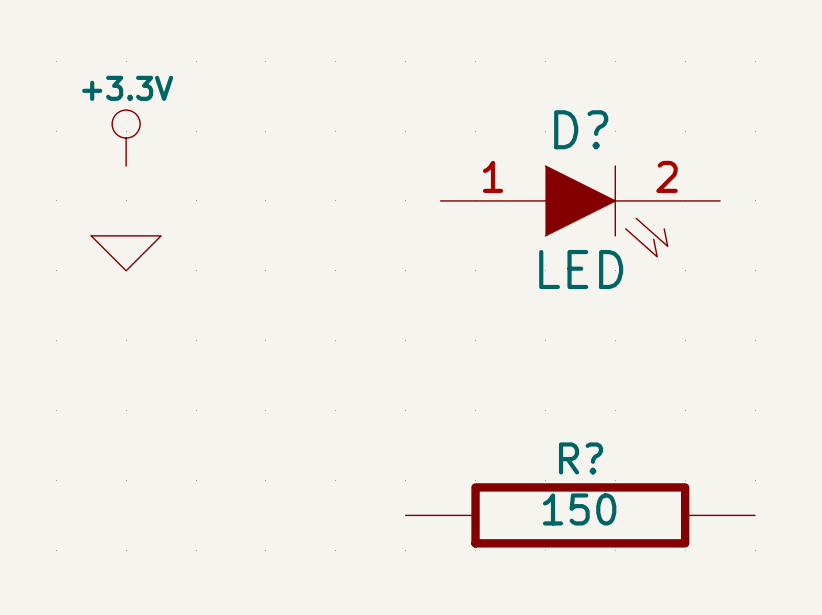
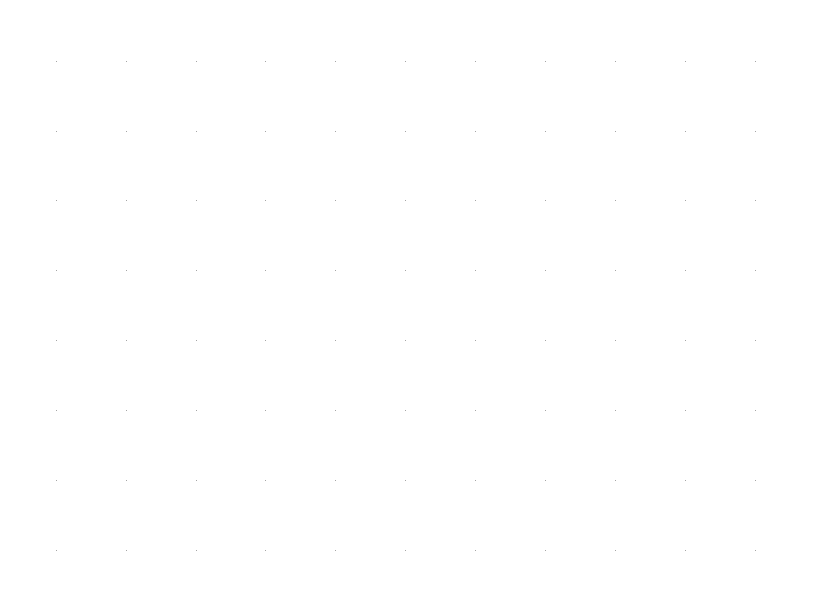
power symbol: +3.3V (126, 138) -> none
D?: LED (580, 211) -> none
power symbol: (126, 253) -> none
R?: 150 (580, 515) -> none

